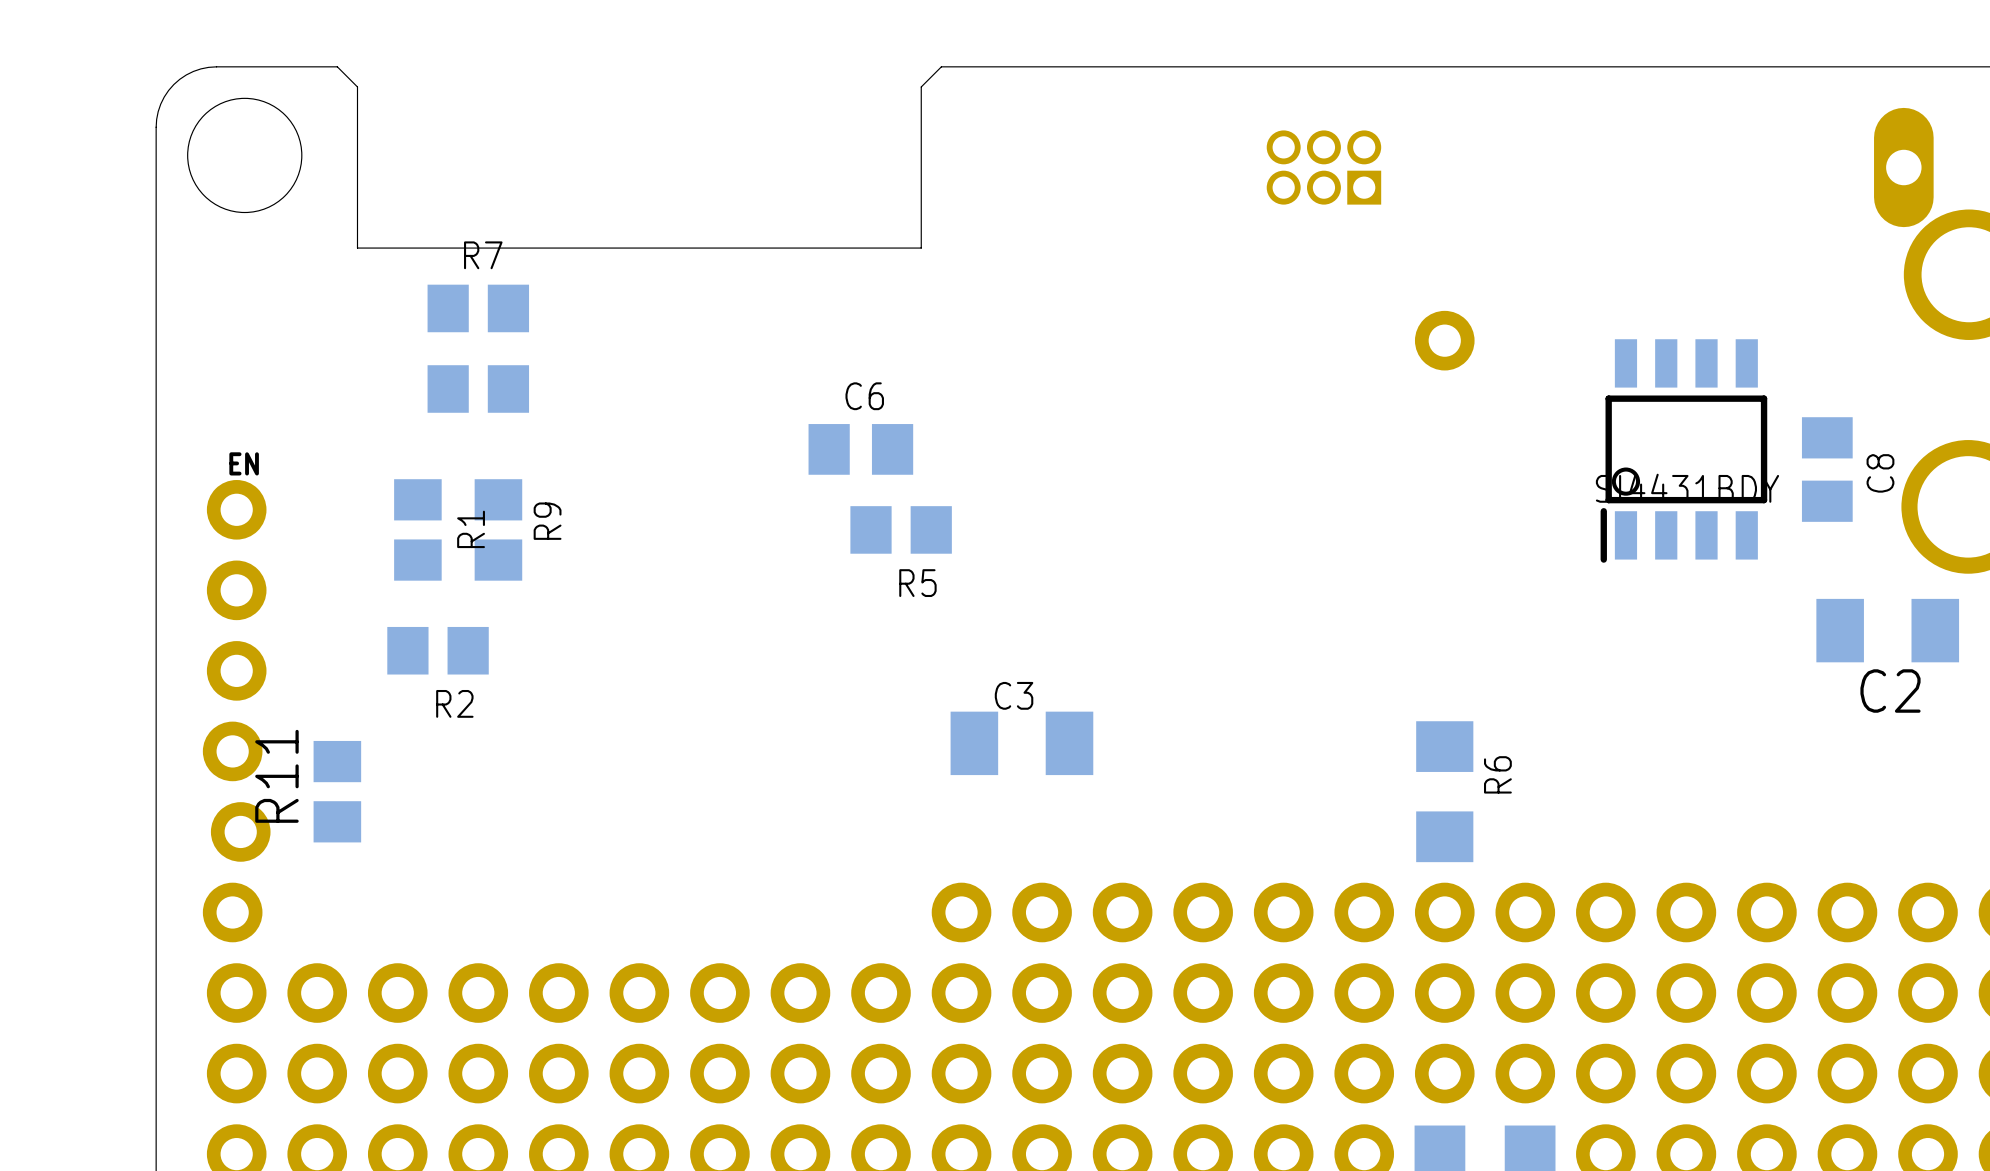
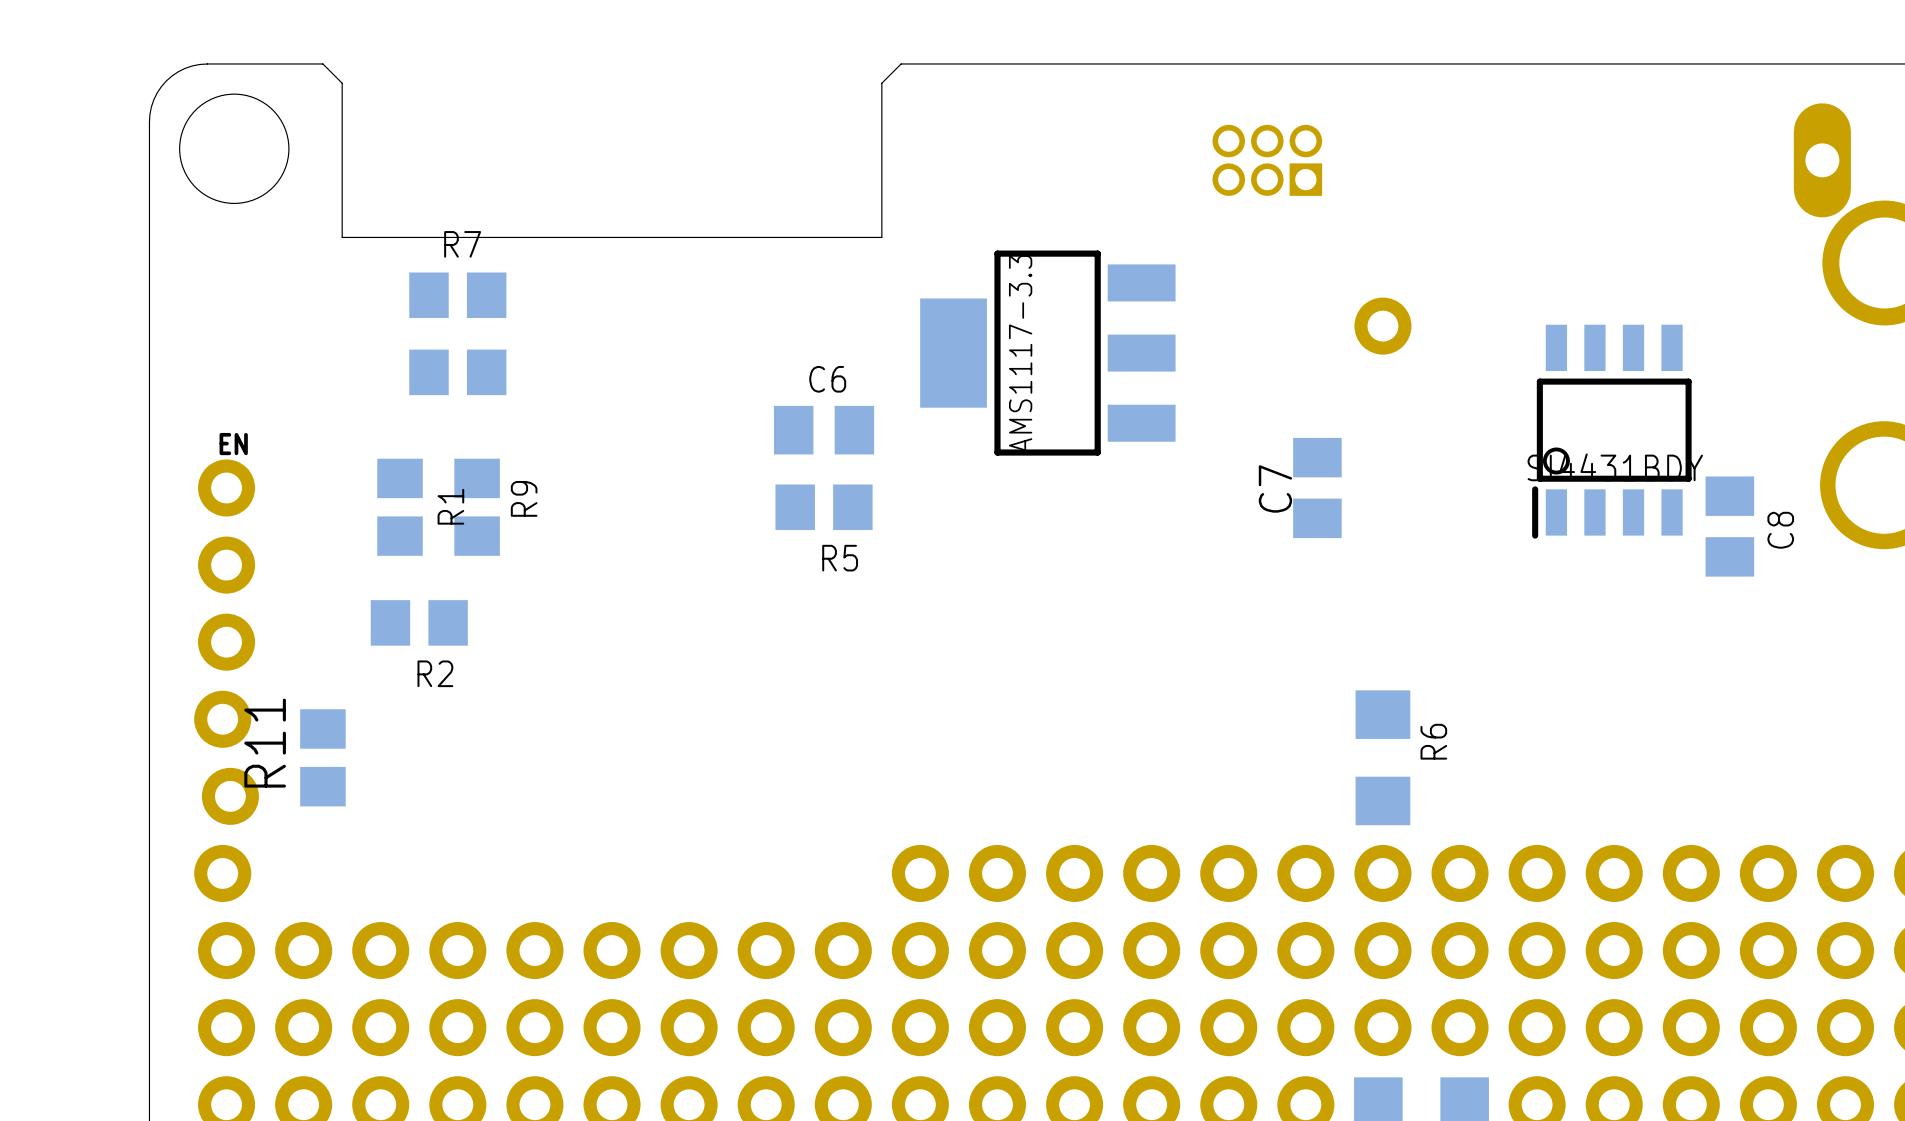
AMS1117-3.3: none -> (1047, 353)
C8 position: (1827, 469) -> (1729, 526)
C7: none -> (1317, 487)
R5 position: (901, 529) -> (824, 507)
C2: (1887, 630) -> none
C3: (1021, 743) -> none

